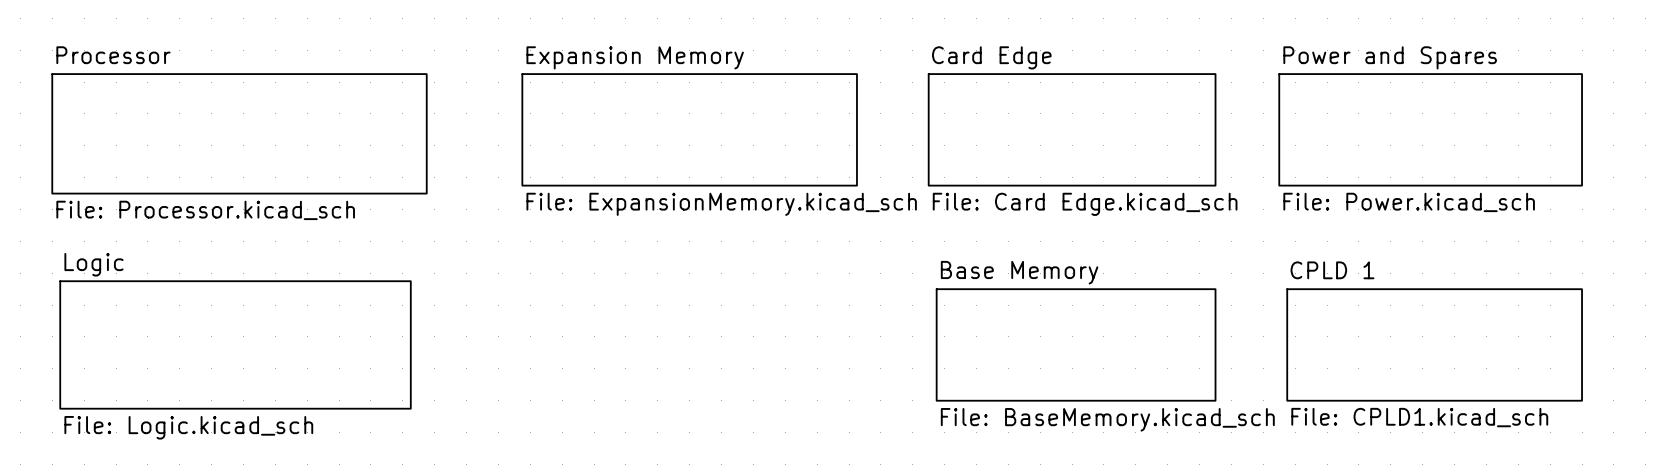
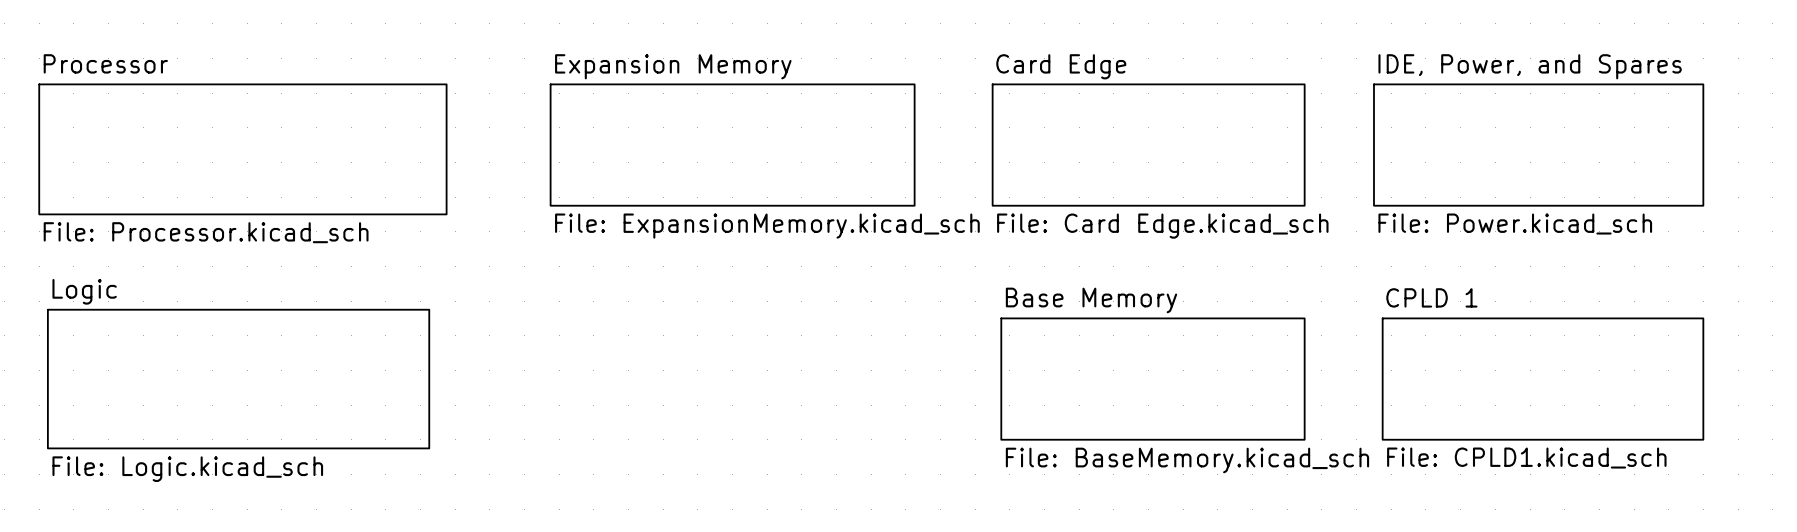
sheet Power and Spares name: Power and Spares (1390, 57) -> IDE, Power, and Spares (1530, 66)

